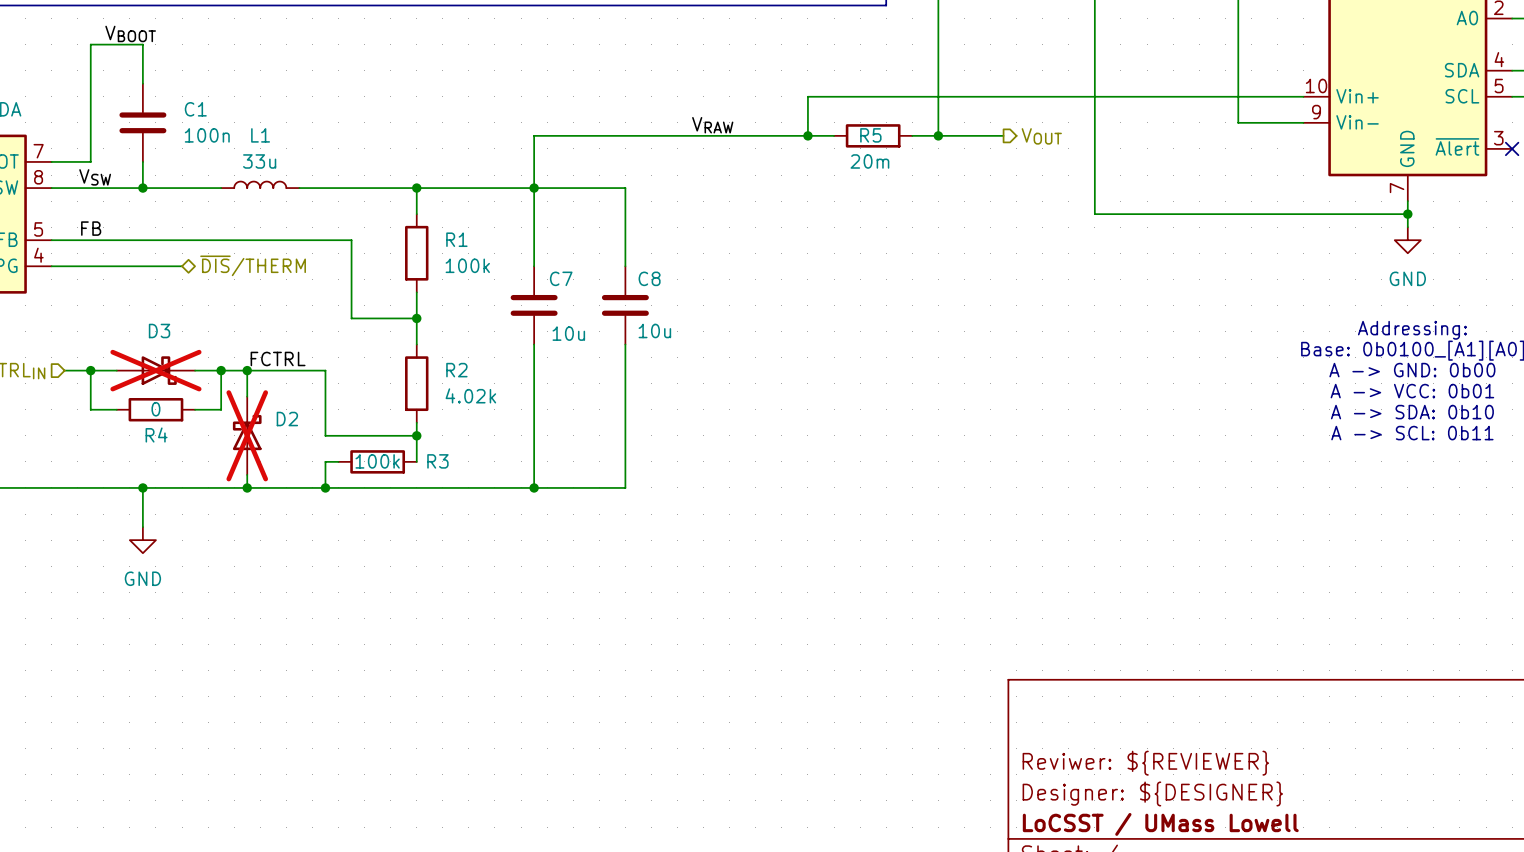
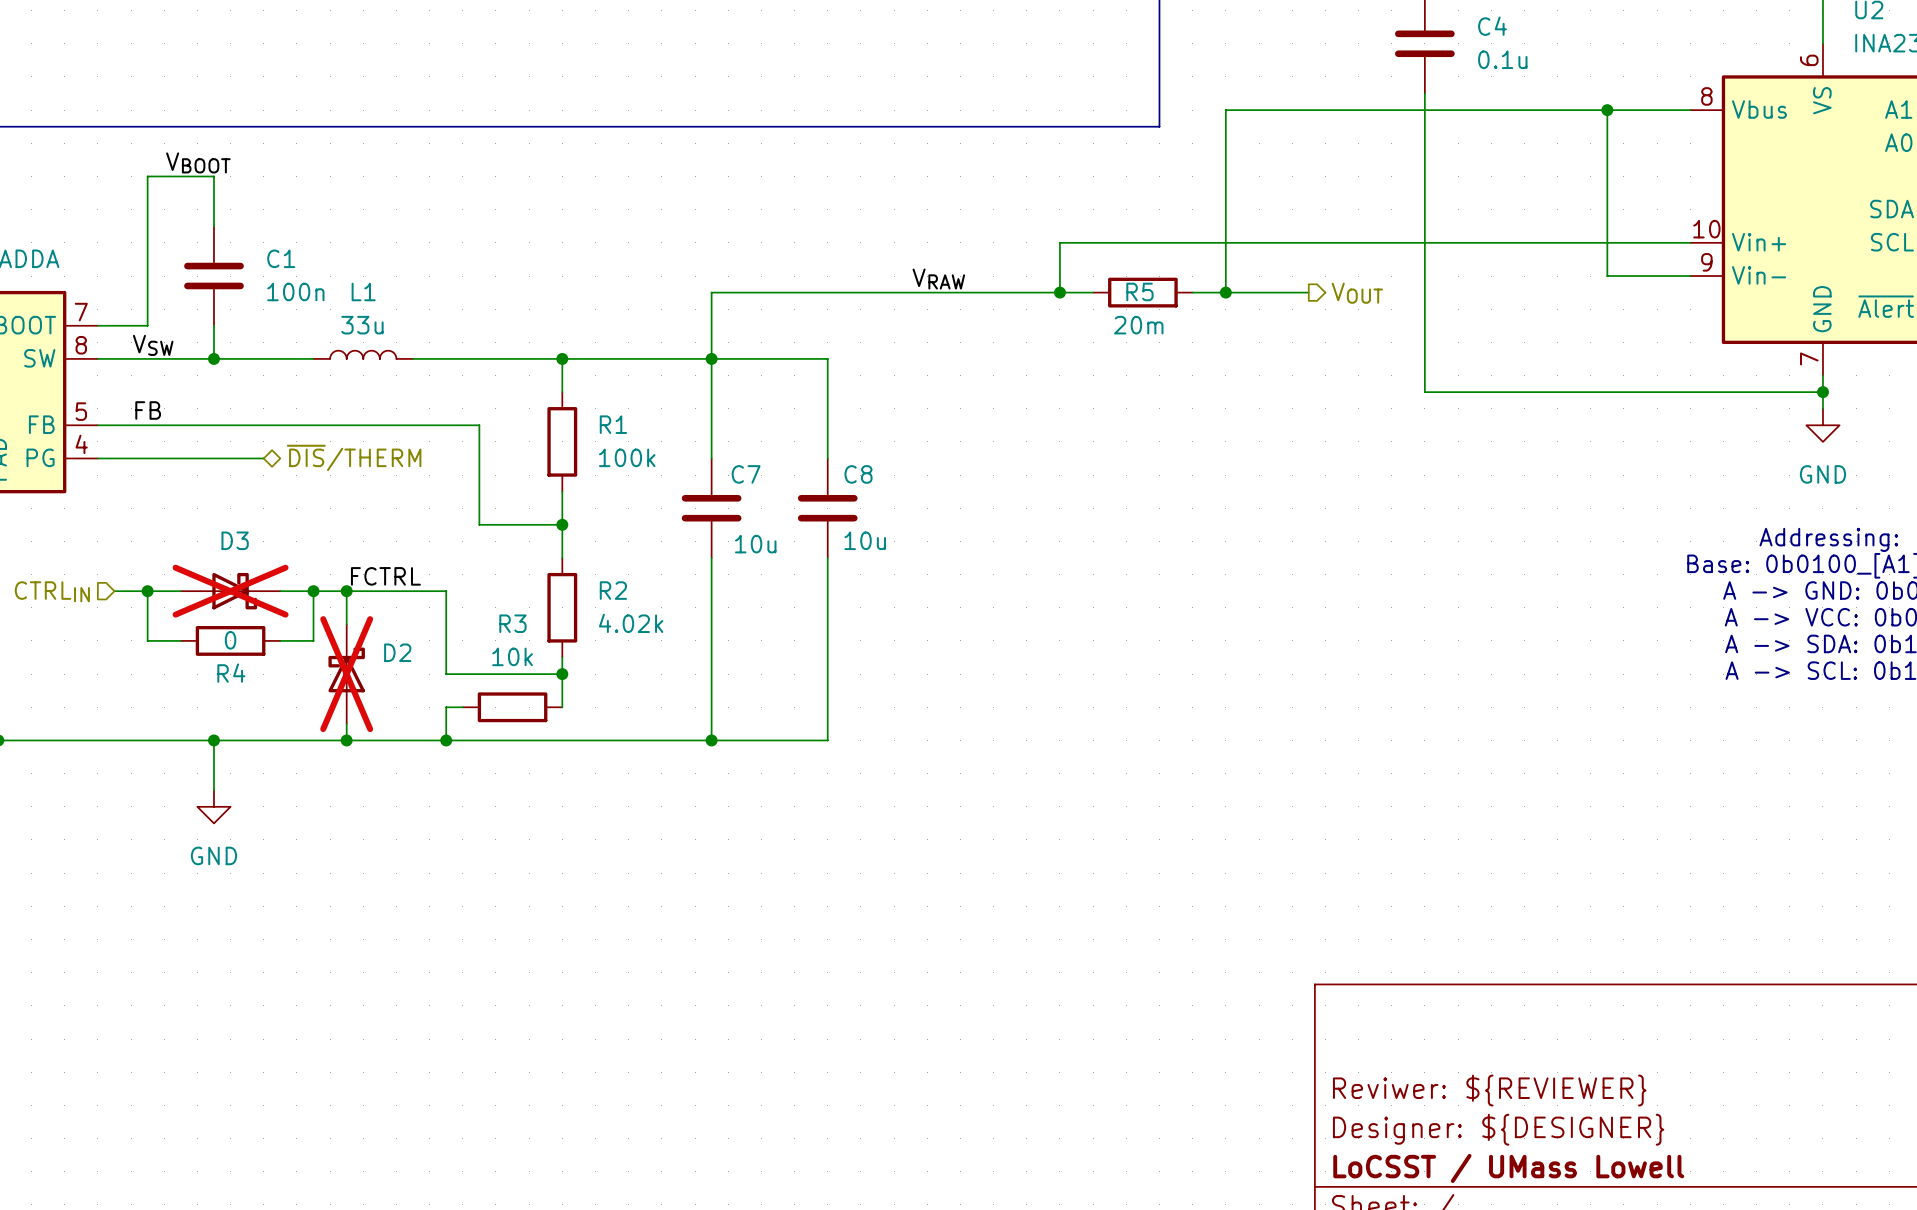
R3 value: 100k (377, 461) -> 10k (512, 656)
R3 name position: R3 (437, 461) -> R3 (512, 623)

